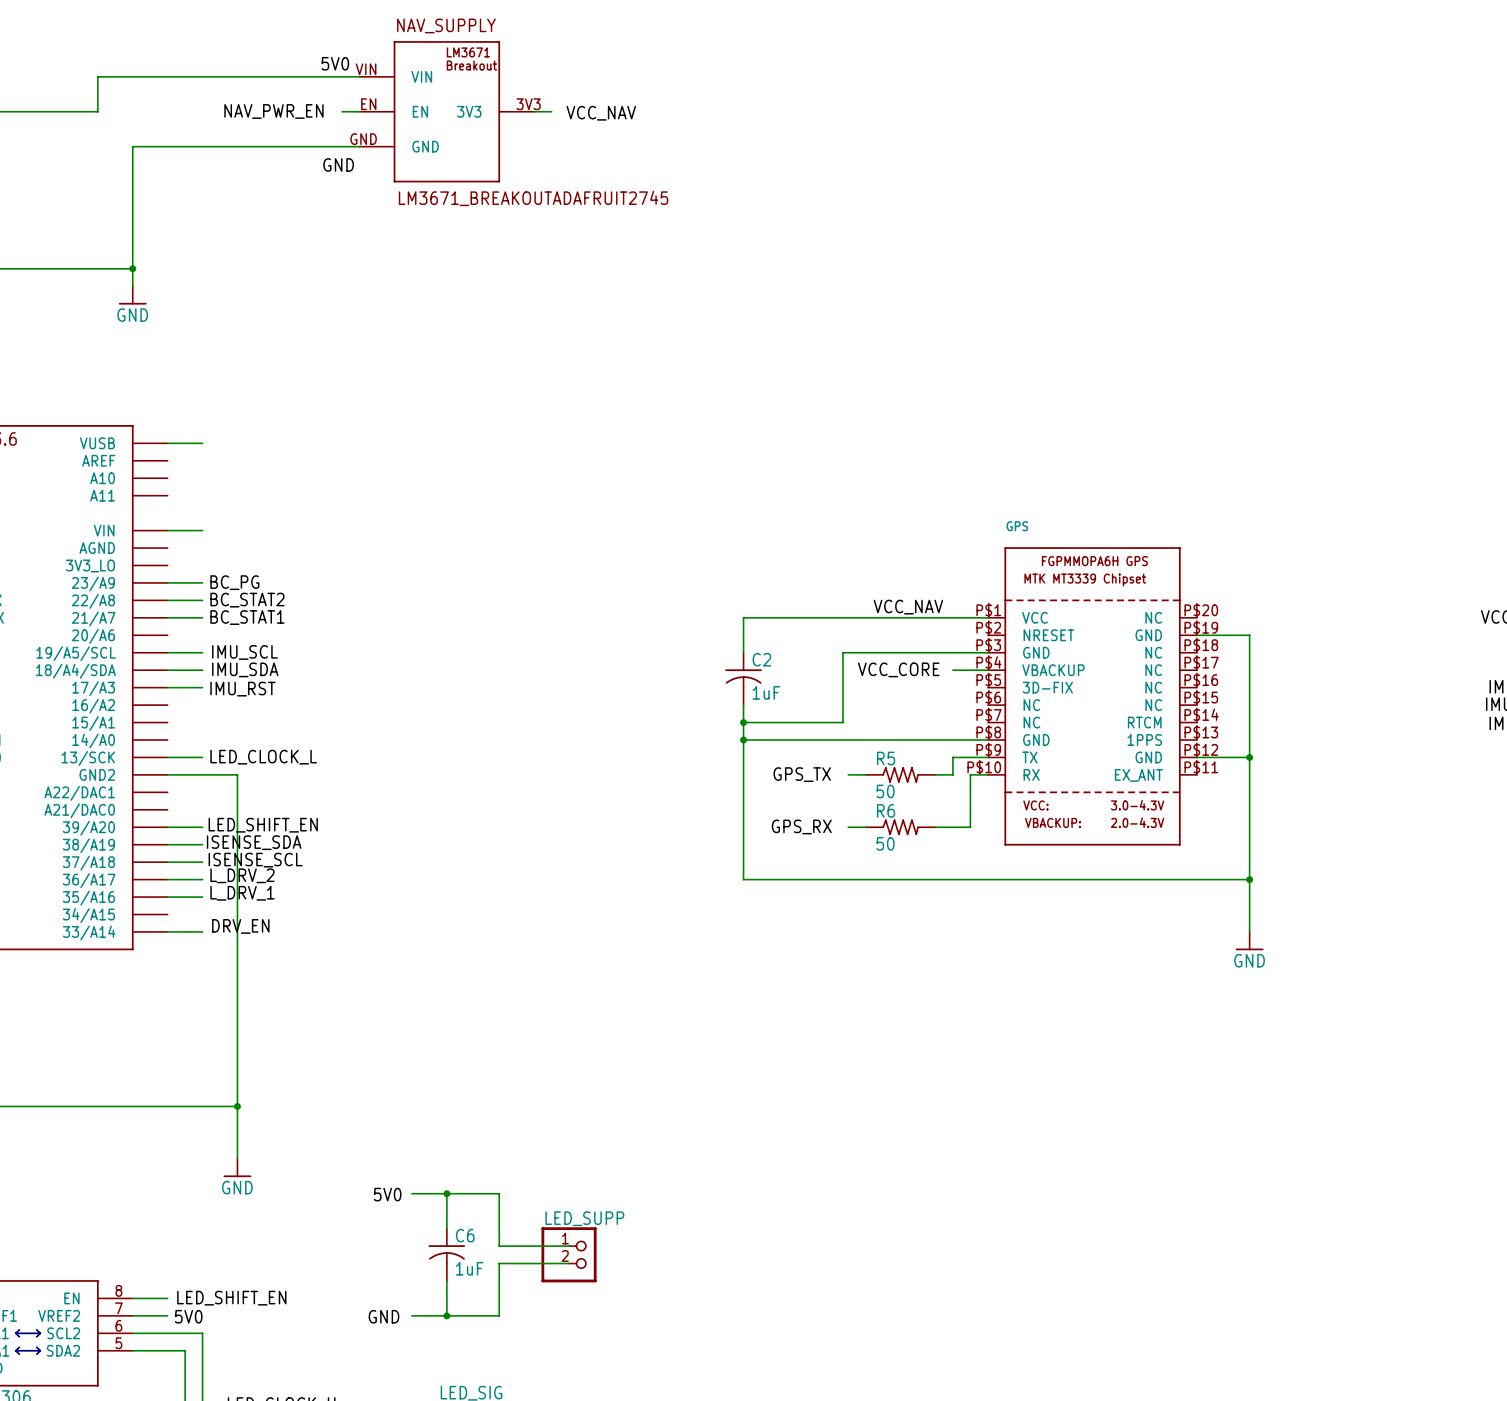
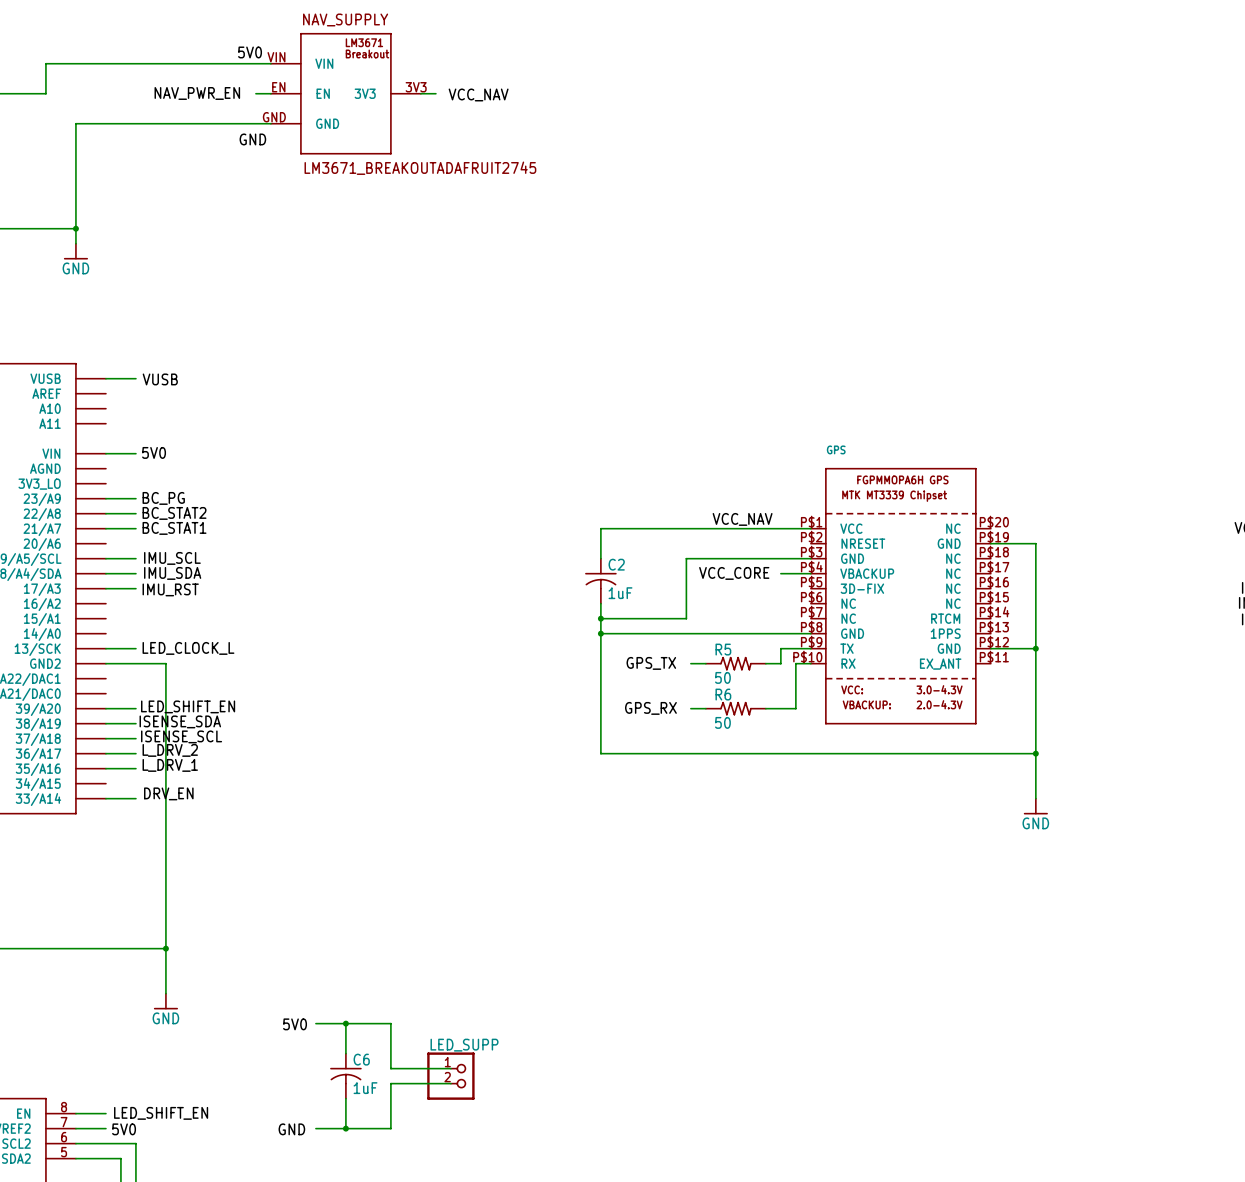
label: none -> VUSB (160, 379)
label: none -> 5V0 (154, 452)

